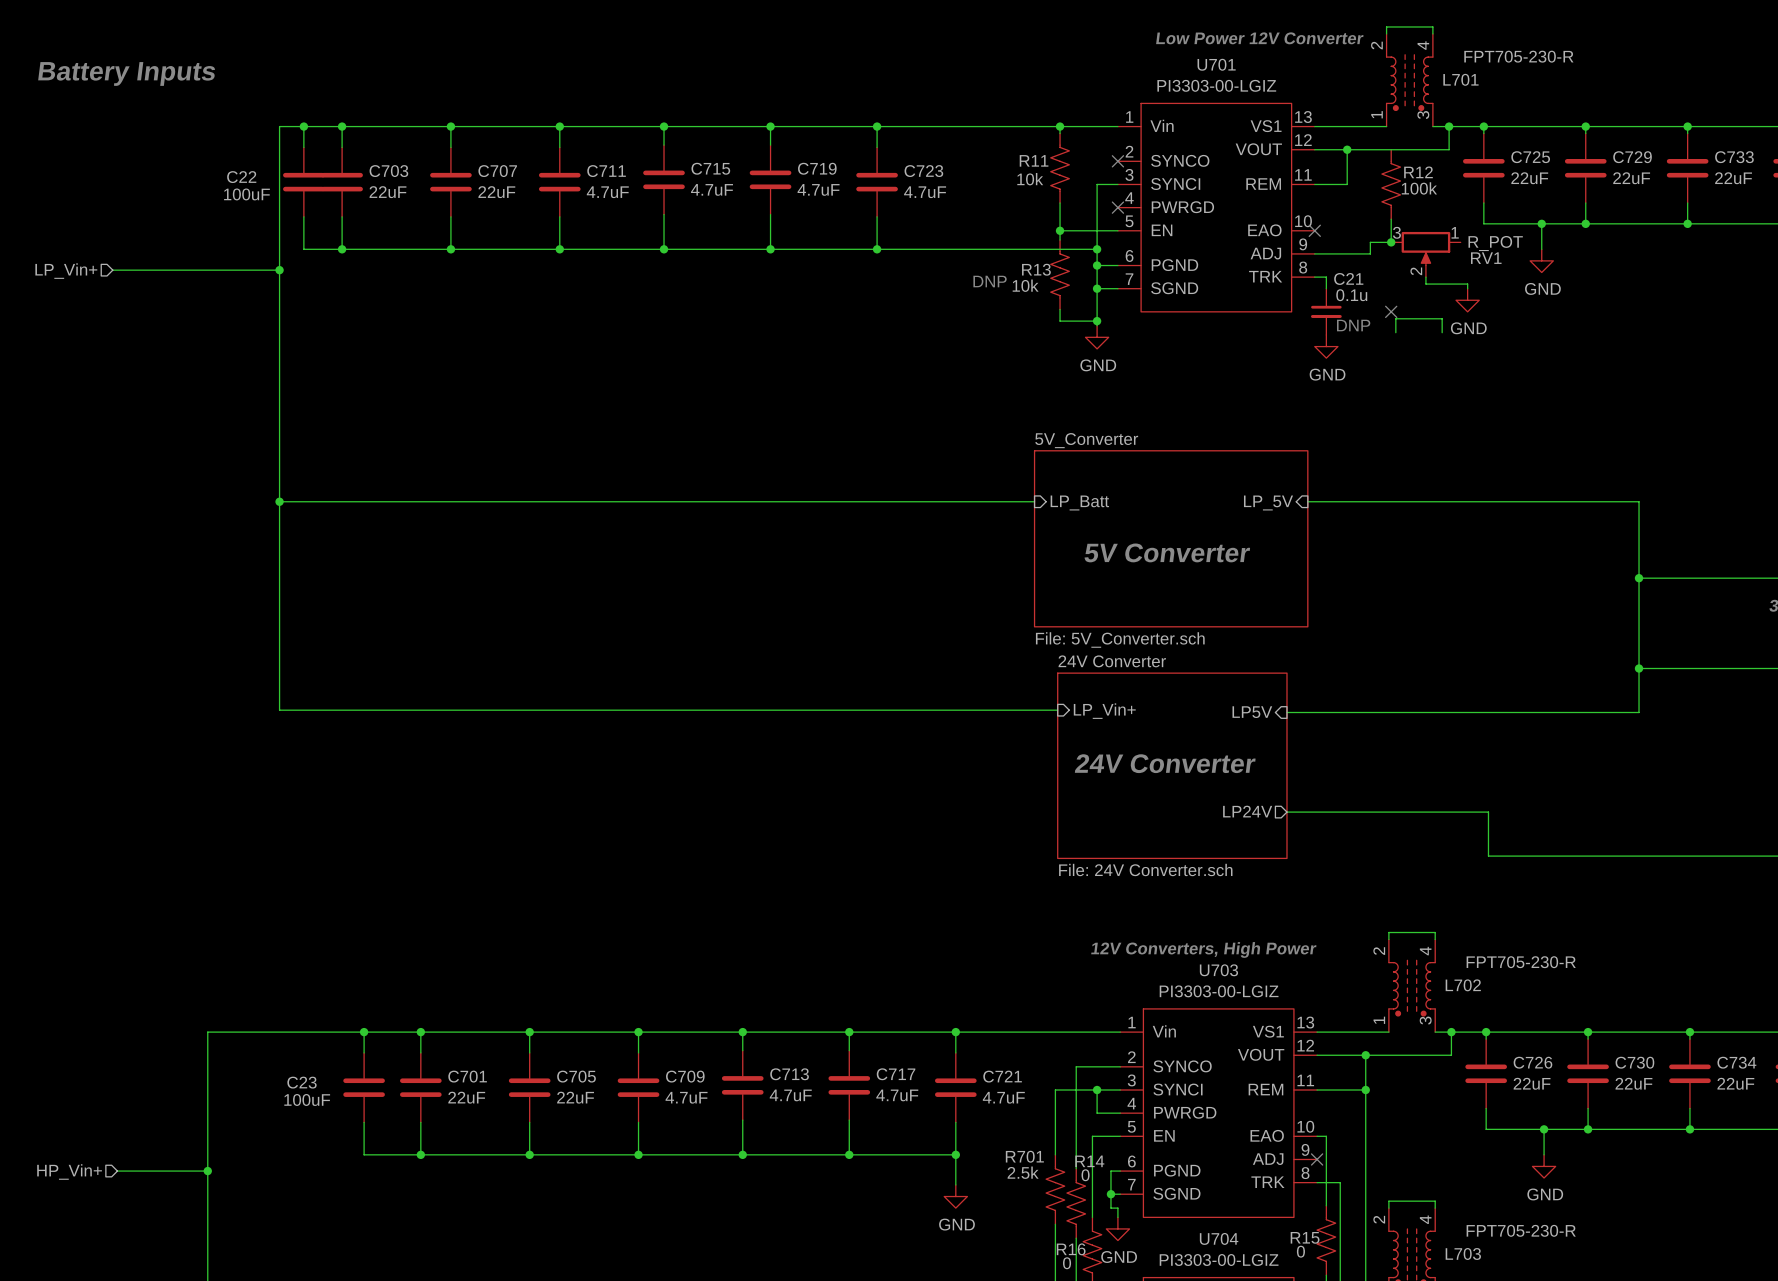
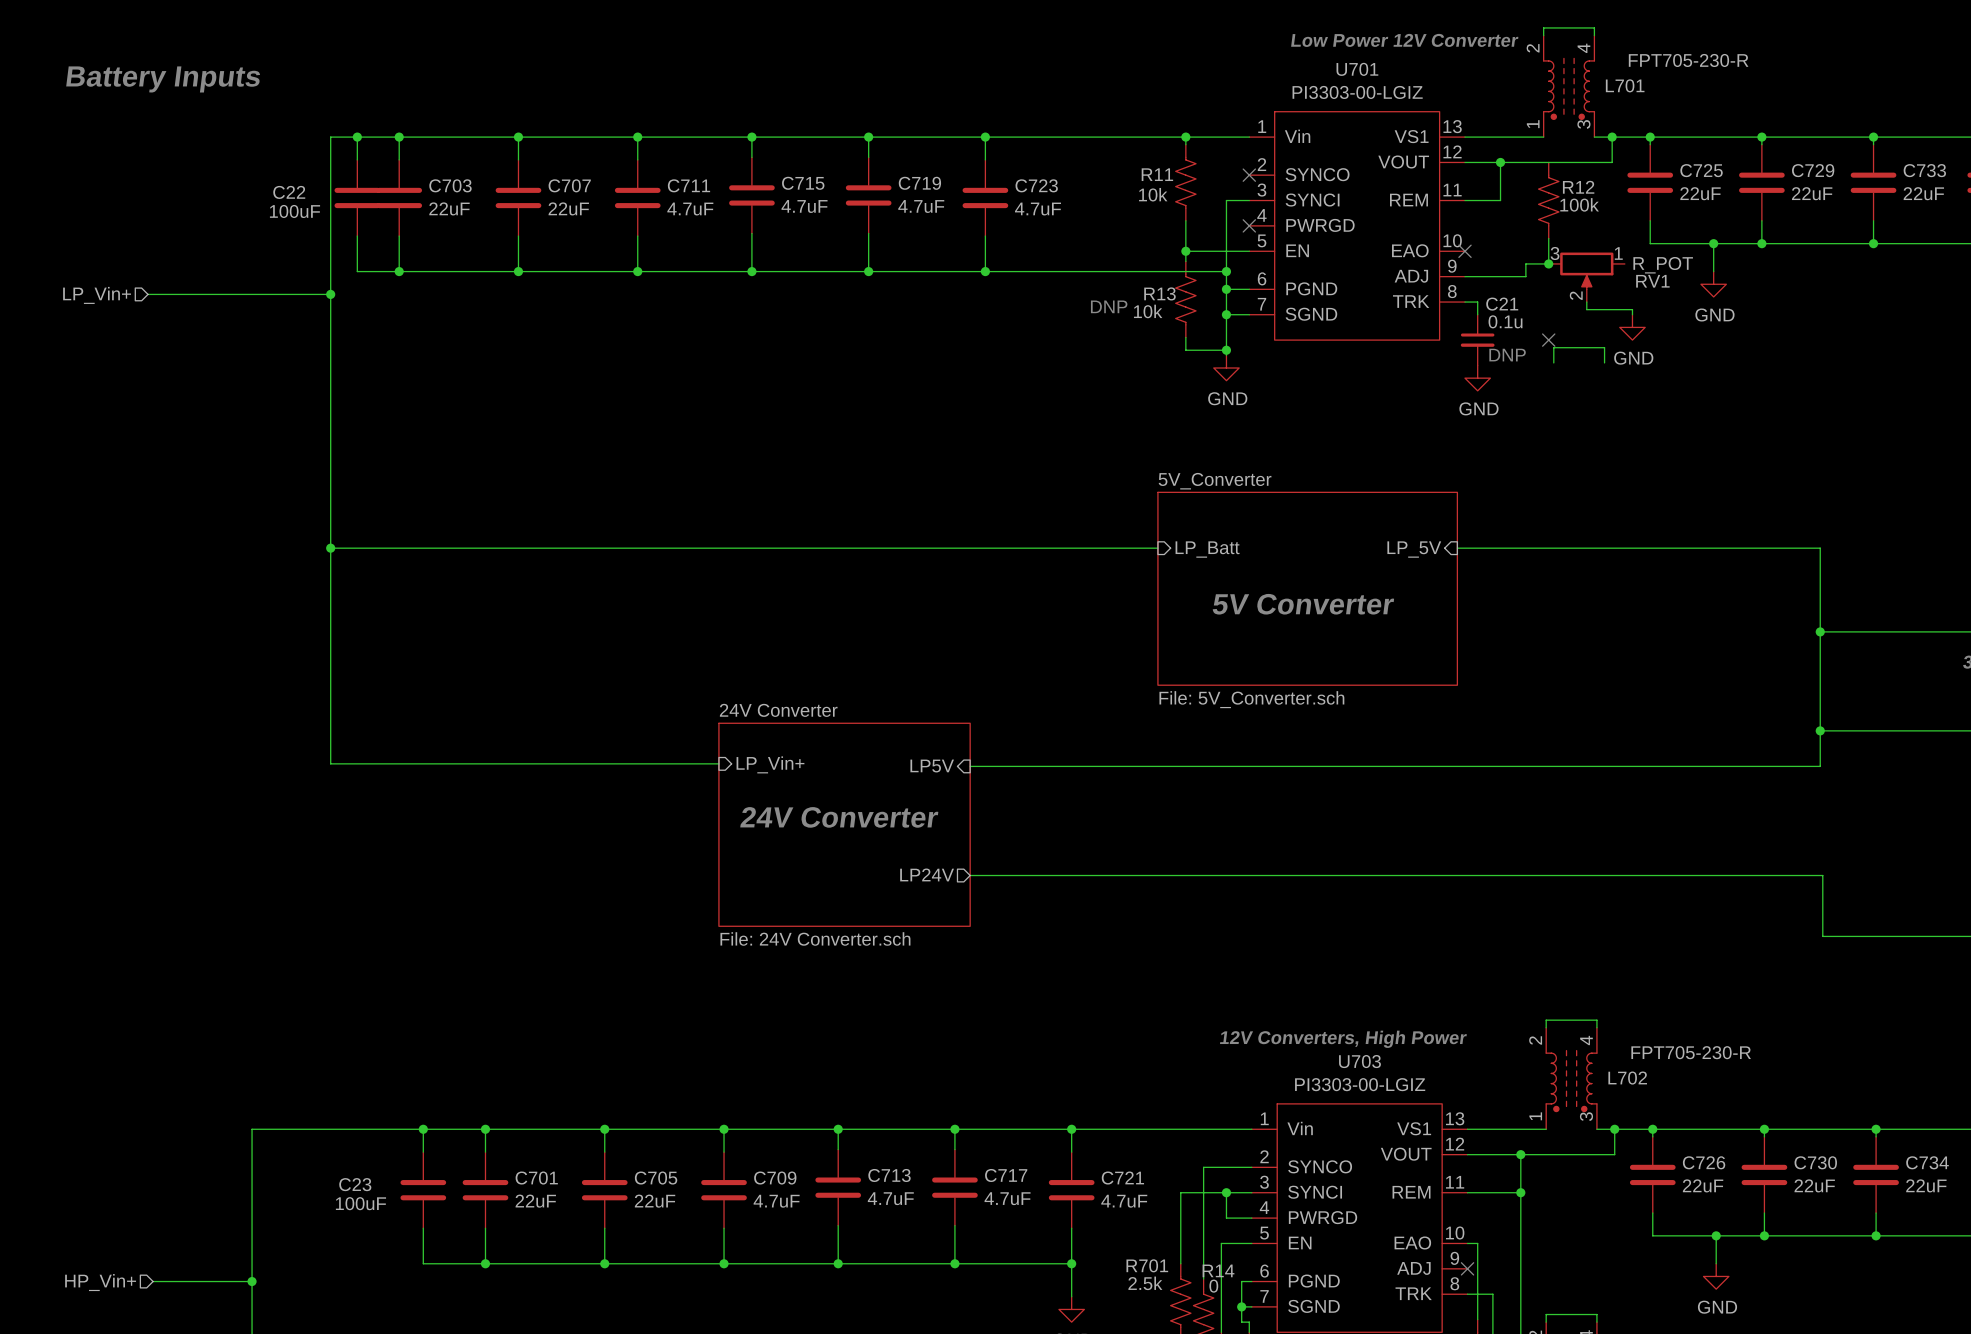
wire: (279, 698) (279, 710) (1057, 710) -> (330, 763) (718, 763)
sheet pin: none -> LP_Vin+ (770, 764)
sheet pin: none -> LP5V (932, 766)
wire: (1639, 700) (1639, 712) (1286, 712) -> (1820, 766) (970, 766)
sheet pin: LP_Vin+ (1104, 711) -> none
sheet pin: LP5V (1252, 712) -> none
text: none -> 24V Converter (839, 817)
text: 24V Converter (1165, 763) -> none
sheet 24V Converter position: (1172, 765) -> (844, 824)
sheet pin: none -> LP24V (927, 874)
sheet pin: LP24V (1247, 811) -> none
wire: (1286, 812) (1488, 812) (1488, 856) (1641, 856) -> (970, 875) (1822, 875) (1822, 936)

